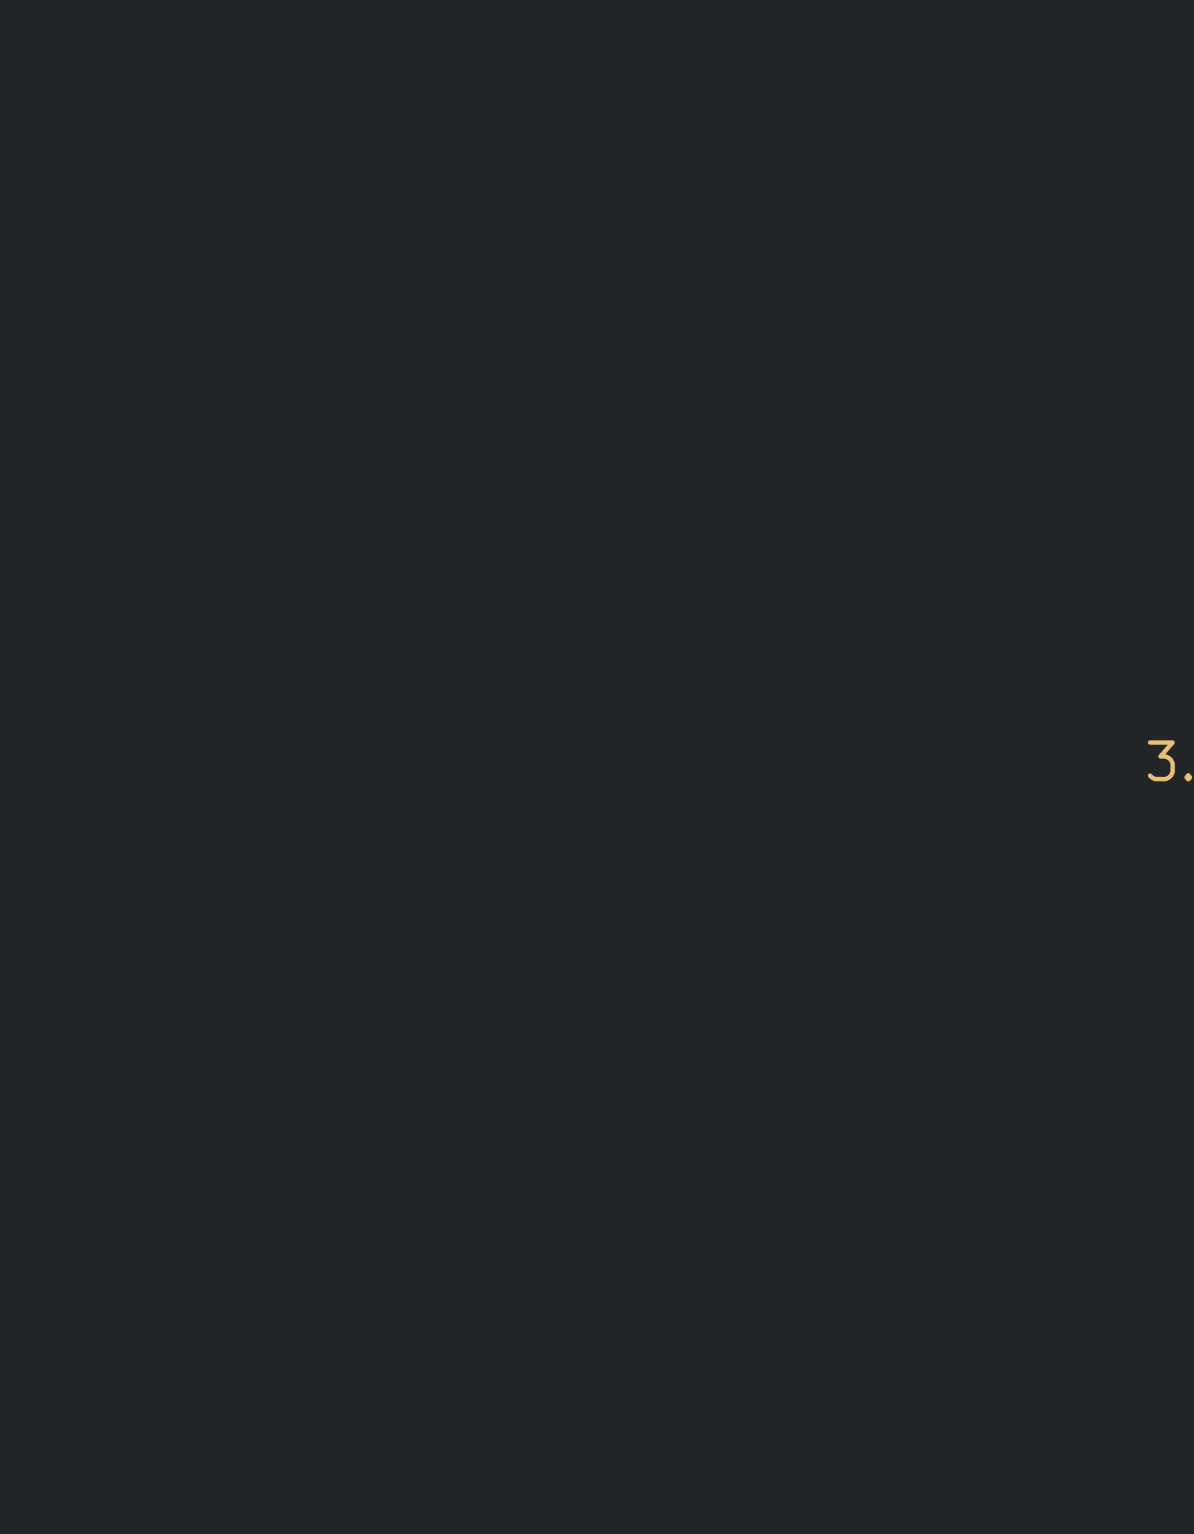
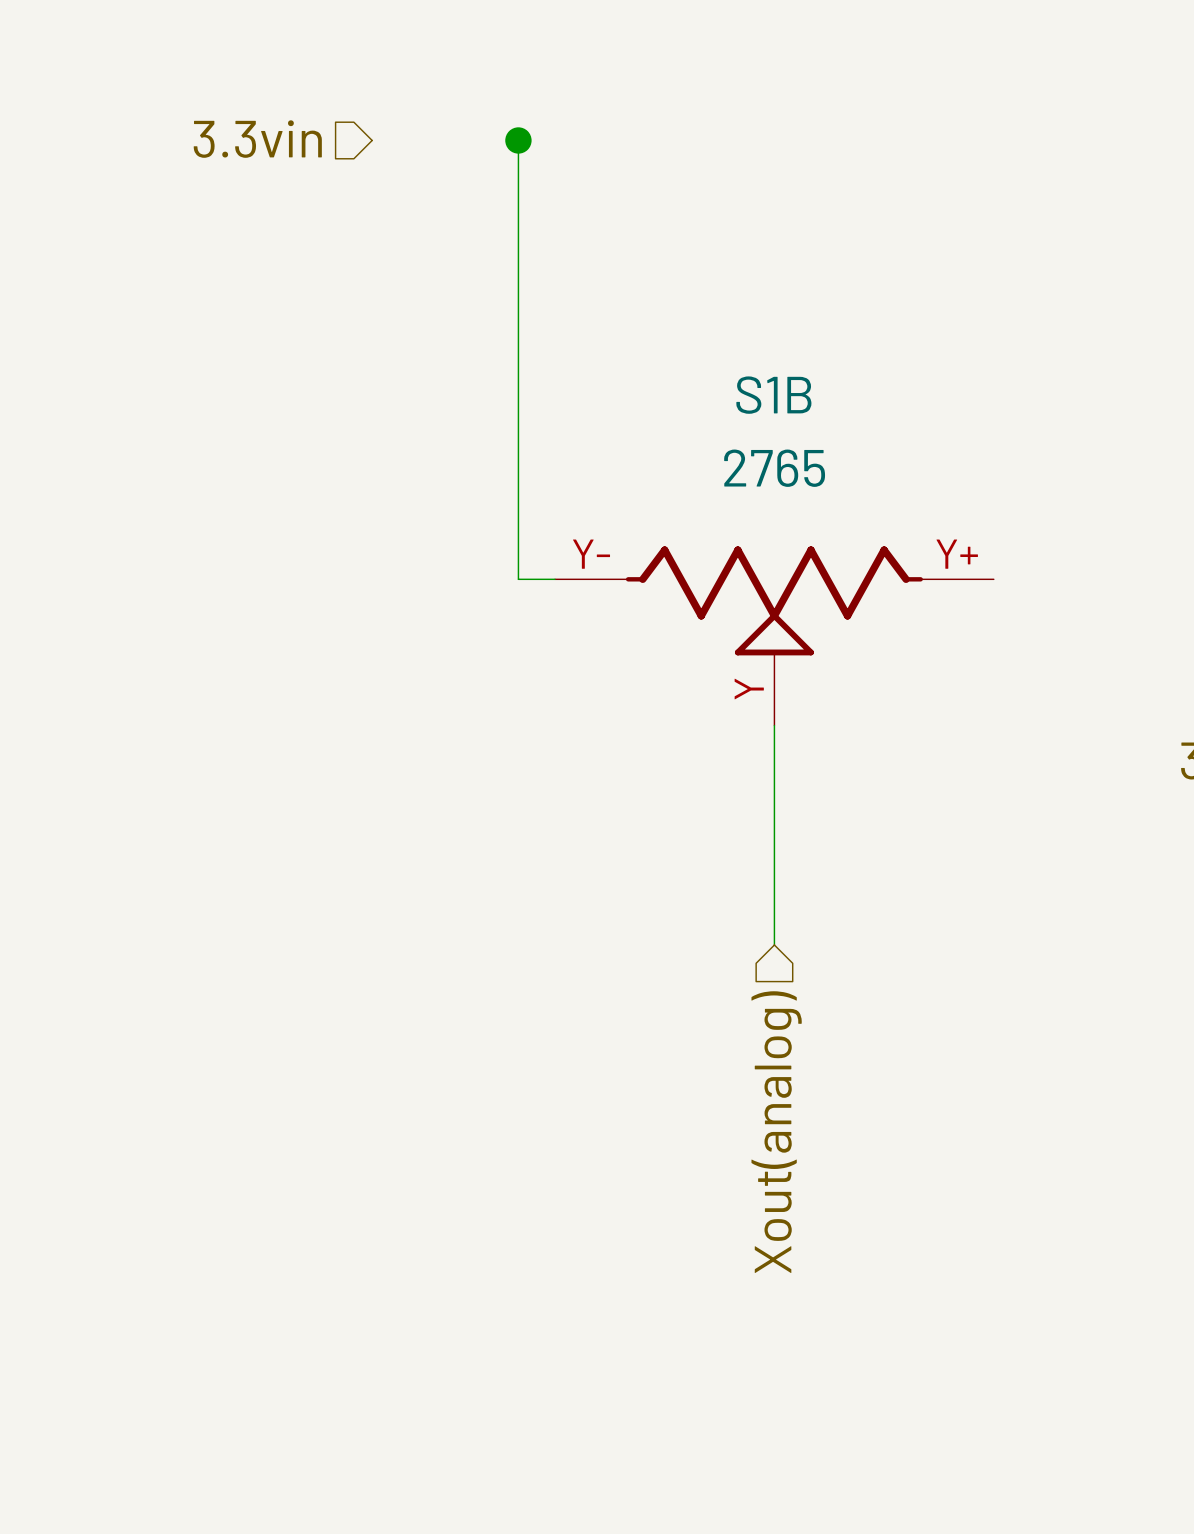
hierarchical label: none -> 3.3vin (257, 139)
wire: none -> (518, 140) (518, 579) (555, 579)
junction: none -> (518, 140)
S1B: none -> 2765 (774, 636)
wire: none -> (774, 725) (774, 945)
hierarchical label: none -> Xout(analog) (776, 1132)

